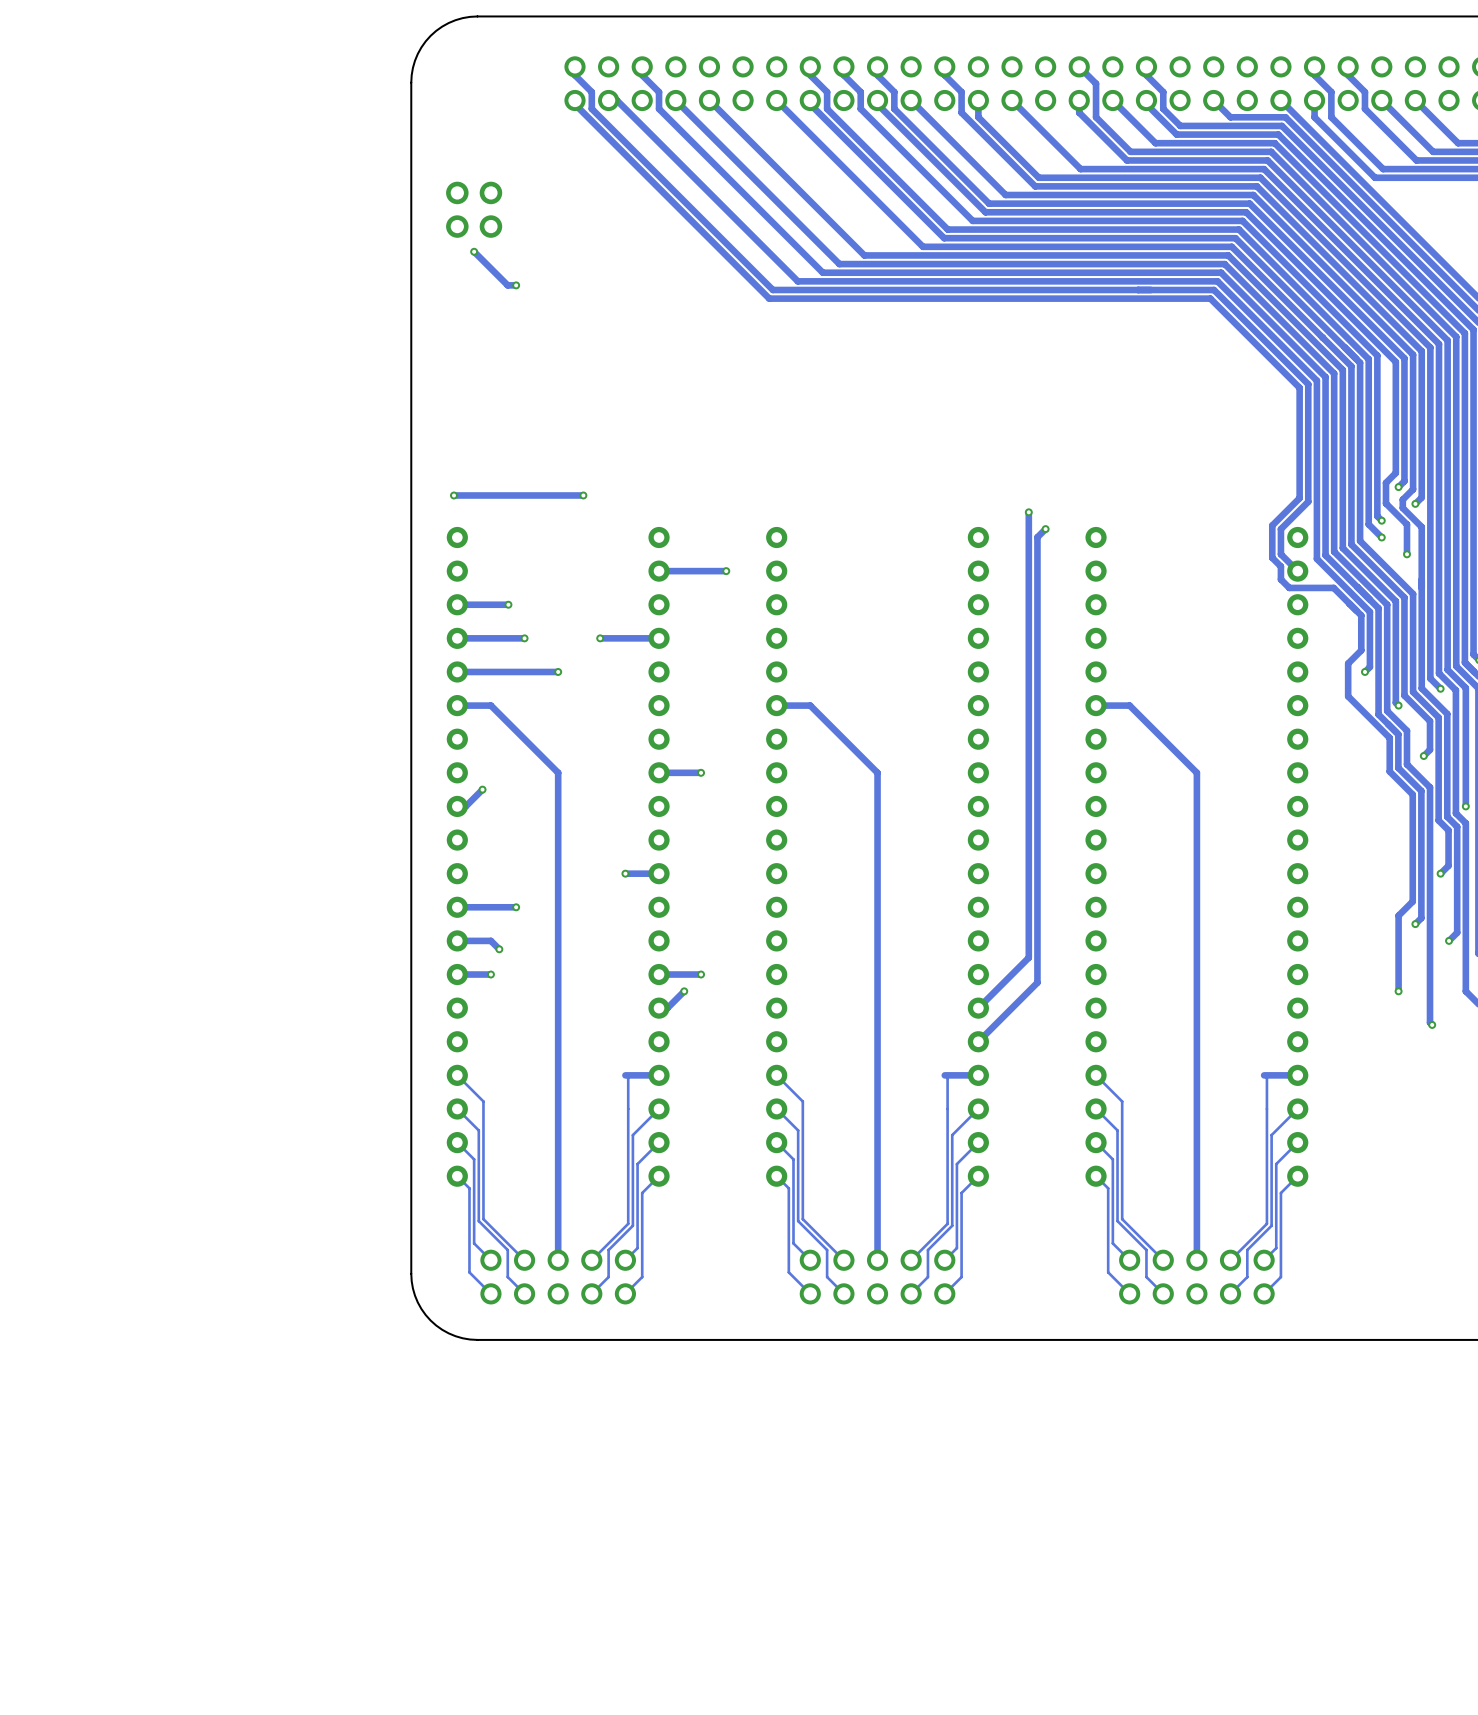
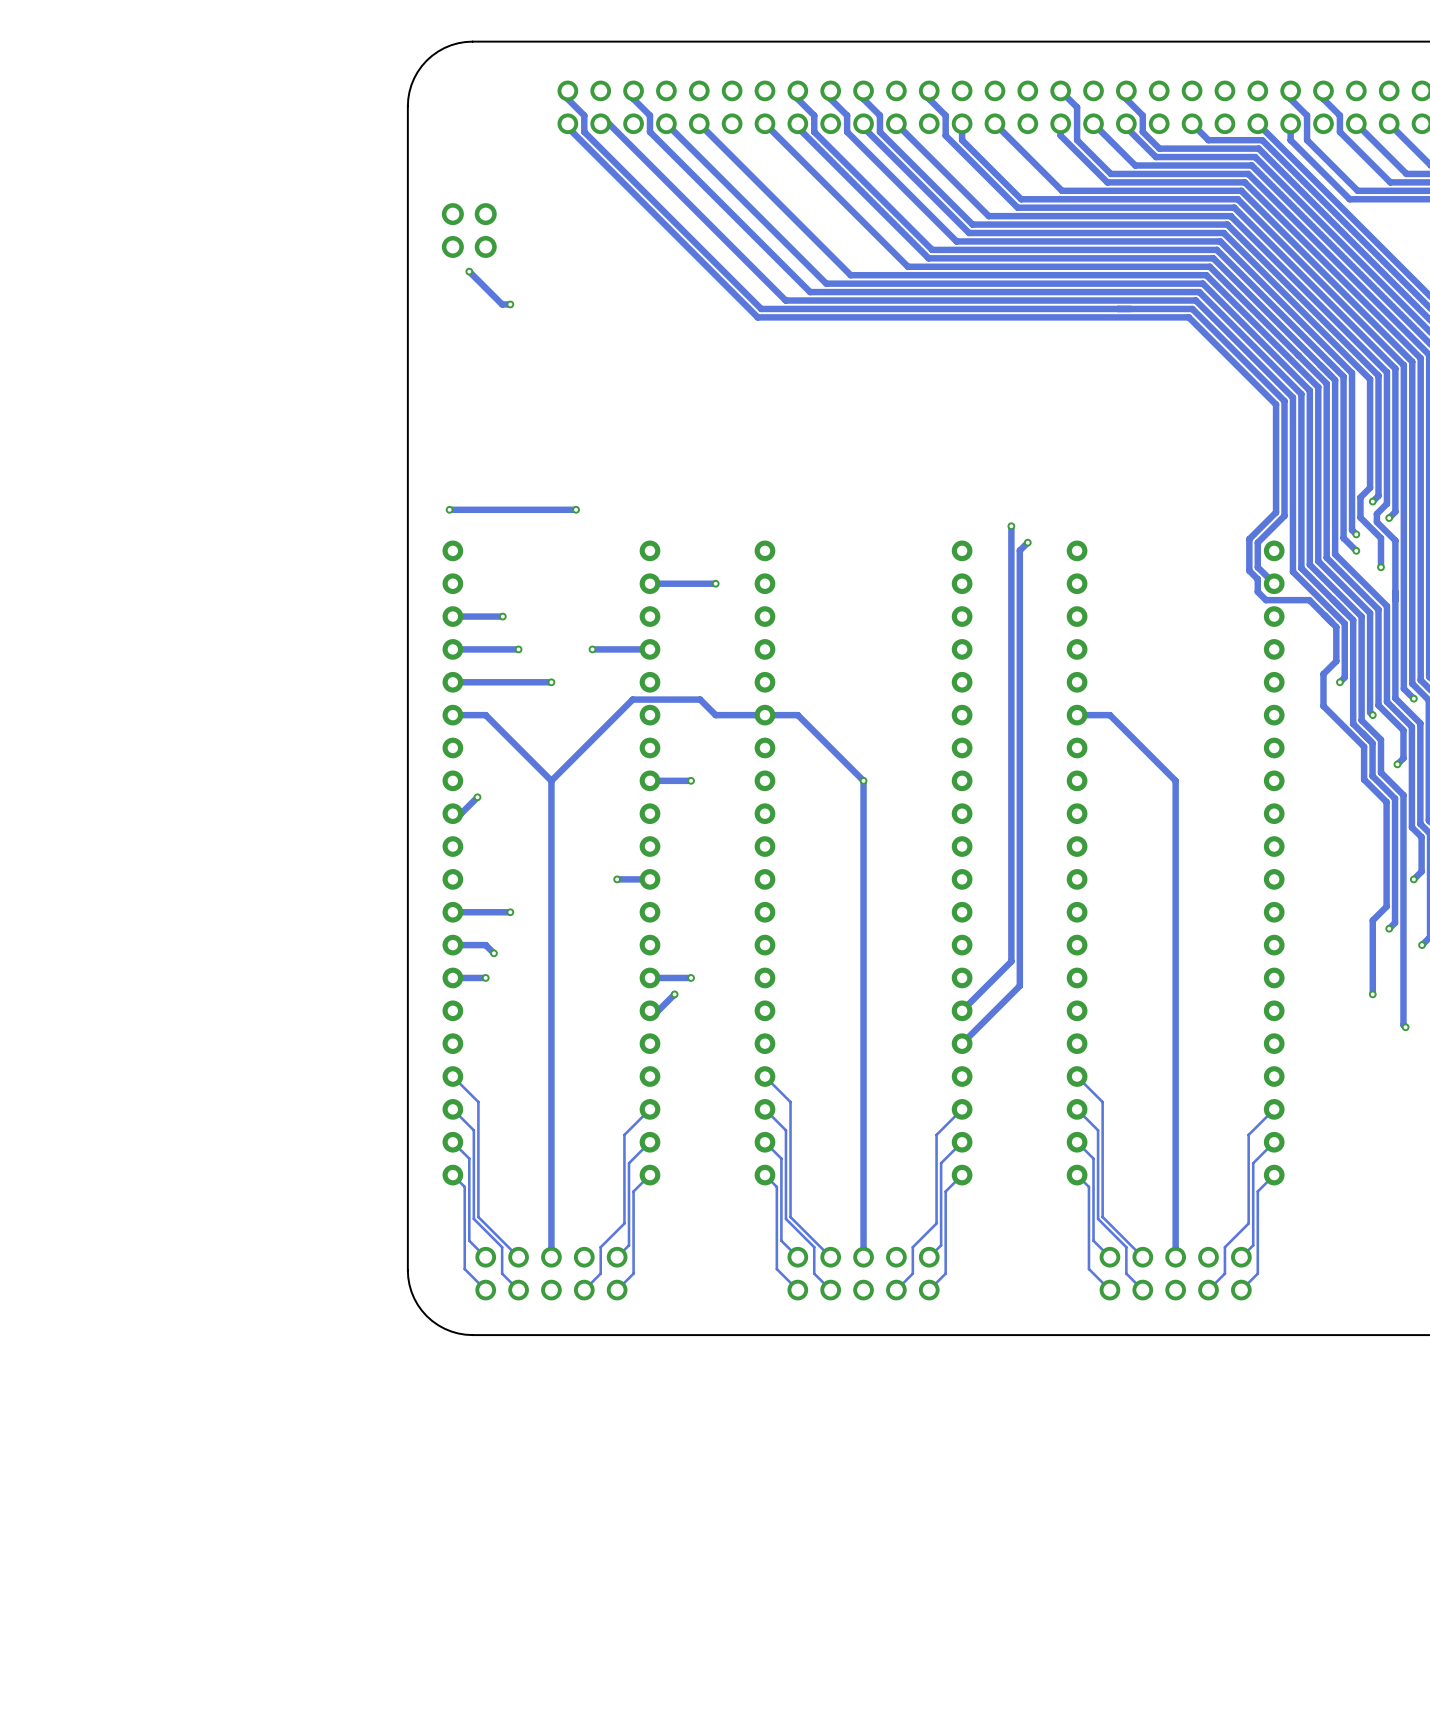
track: none -> (764, 715) (715, 715) (700, 699) (632, 699) (551, 780)
via: none -> (863, 780)
track: (659, 1075) (625, 1075) (628, 1078) (628, 1223) (591, 1260) -> none
track: (978, 1075) (944, 1075) (947, 1078) (947, 1223) (911, 1260) -> none
track: (1297, 1075) (1264, 1075) (1266, 1078) (1266, 1223) (1230, 1260) -> none

